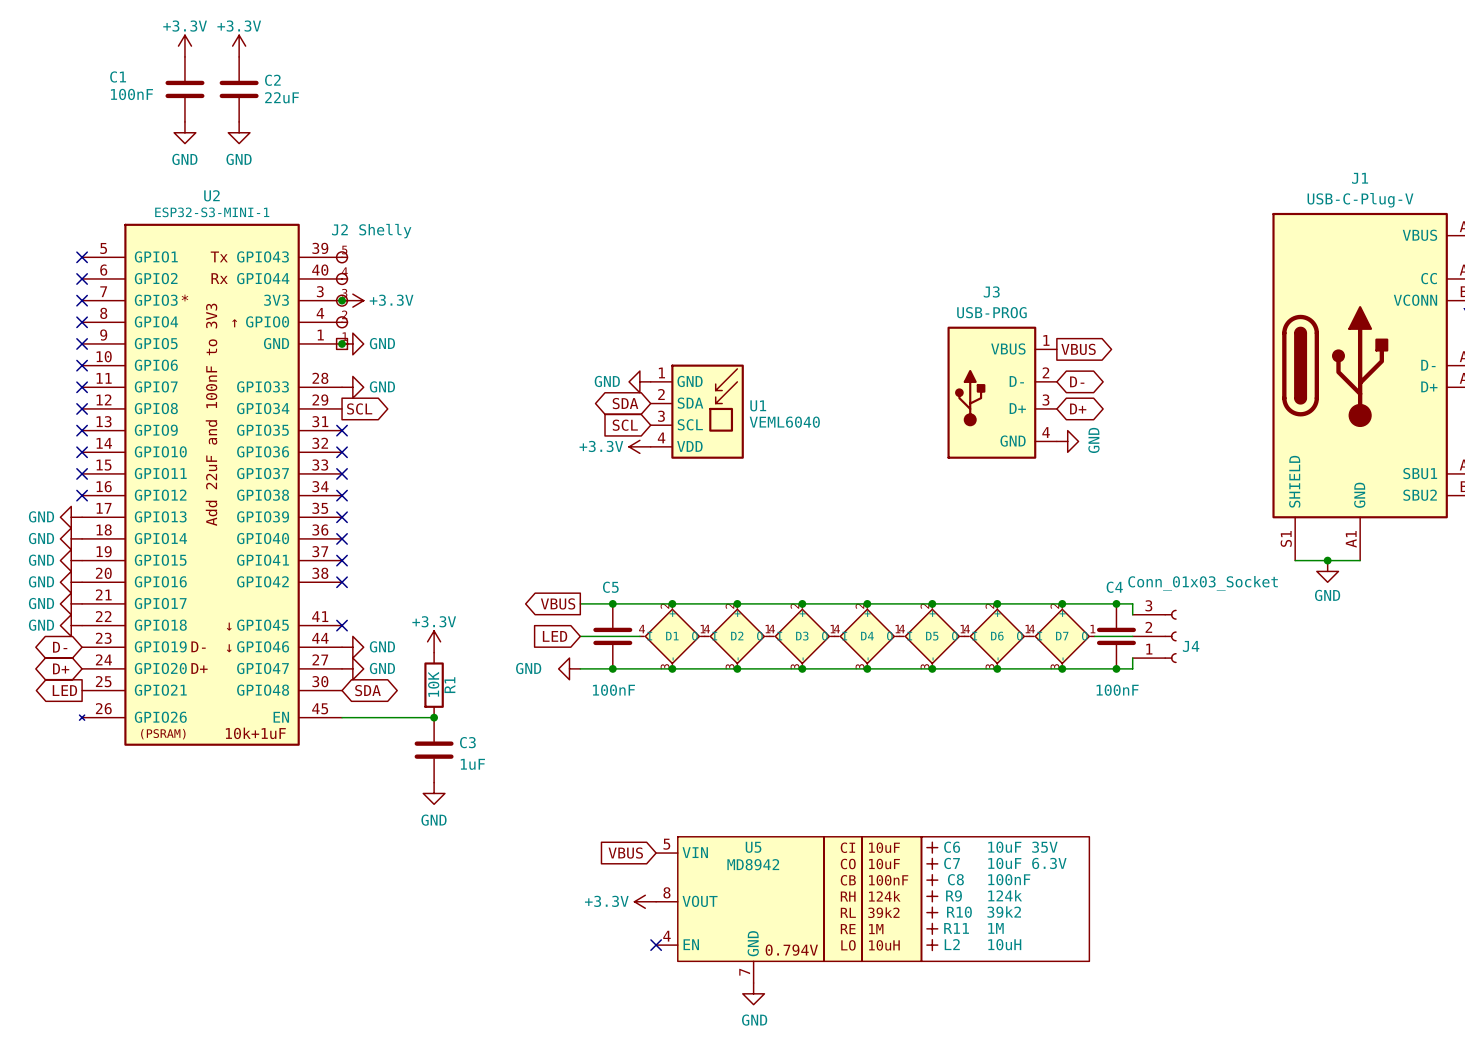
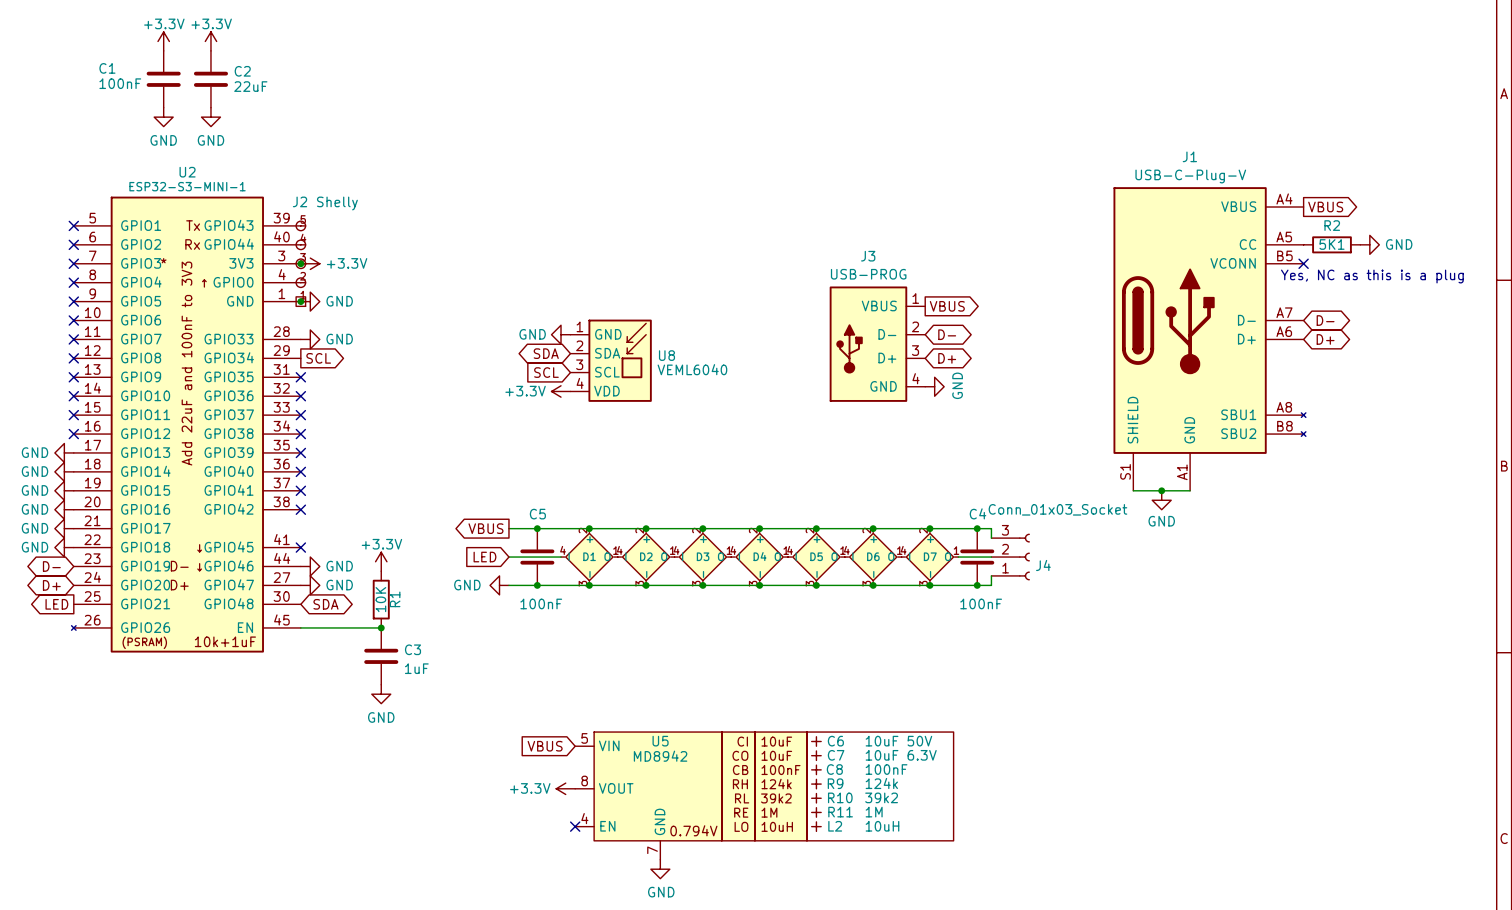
U1 name: U1 (758, 405) -> U8 (666, 355)
C6 value: 10uF 35V (1022, 847) -> 10uF 50V (898, 741)

